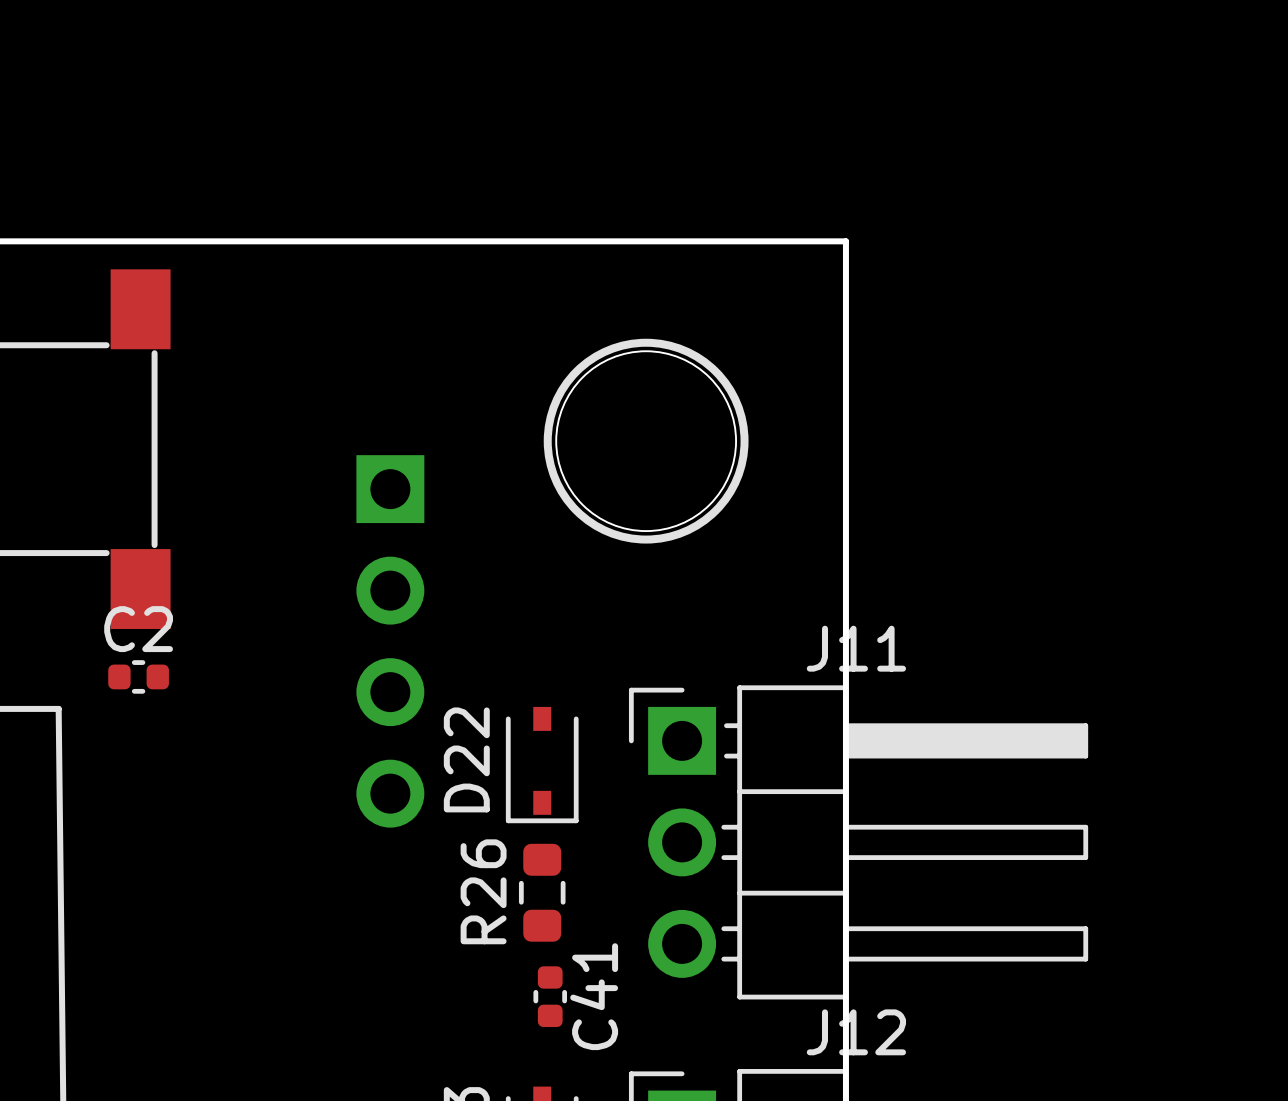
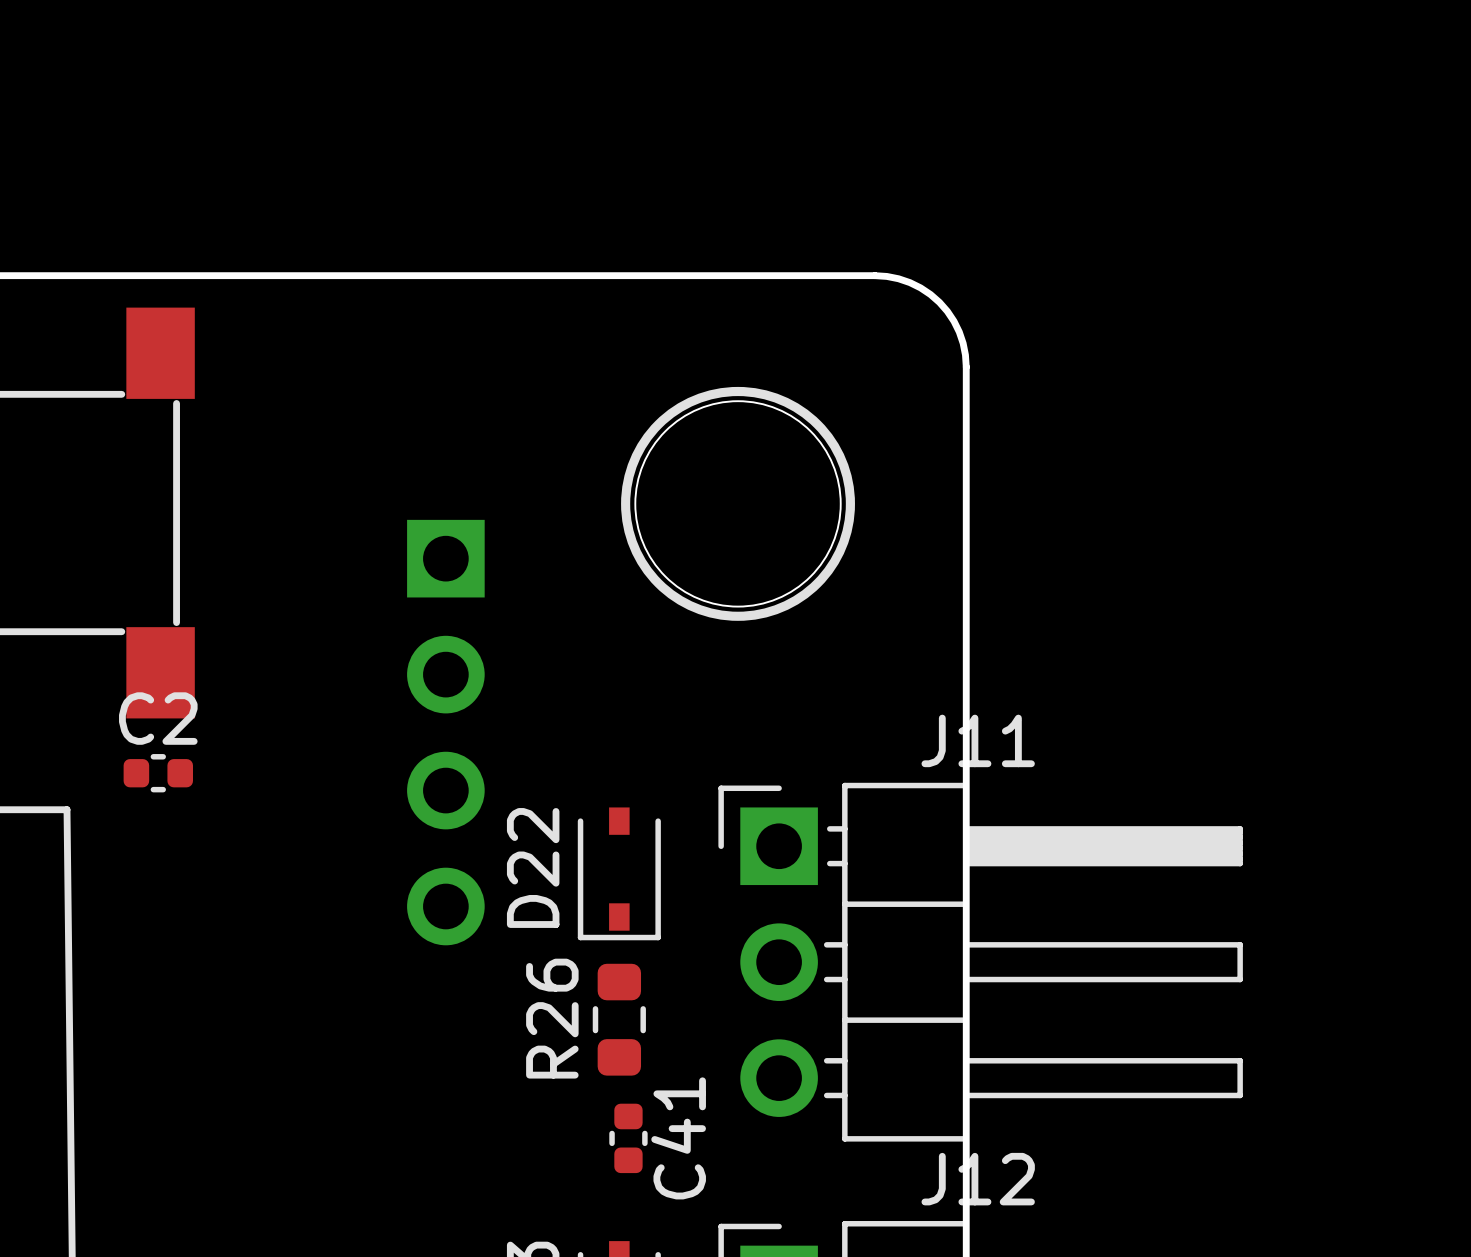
board edge: (766, 241) (845, 241) (845, 321) -> (874, 275) (898, 278) (909, 282) (930, 294) (939, 302) (947, 311) (959, 332) (965, 355) (966, 366)

